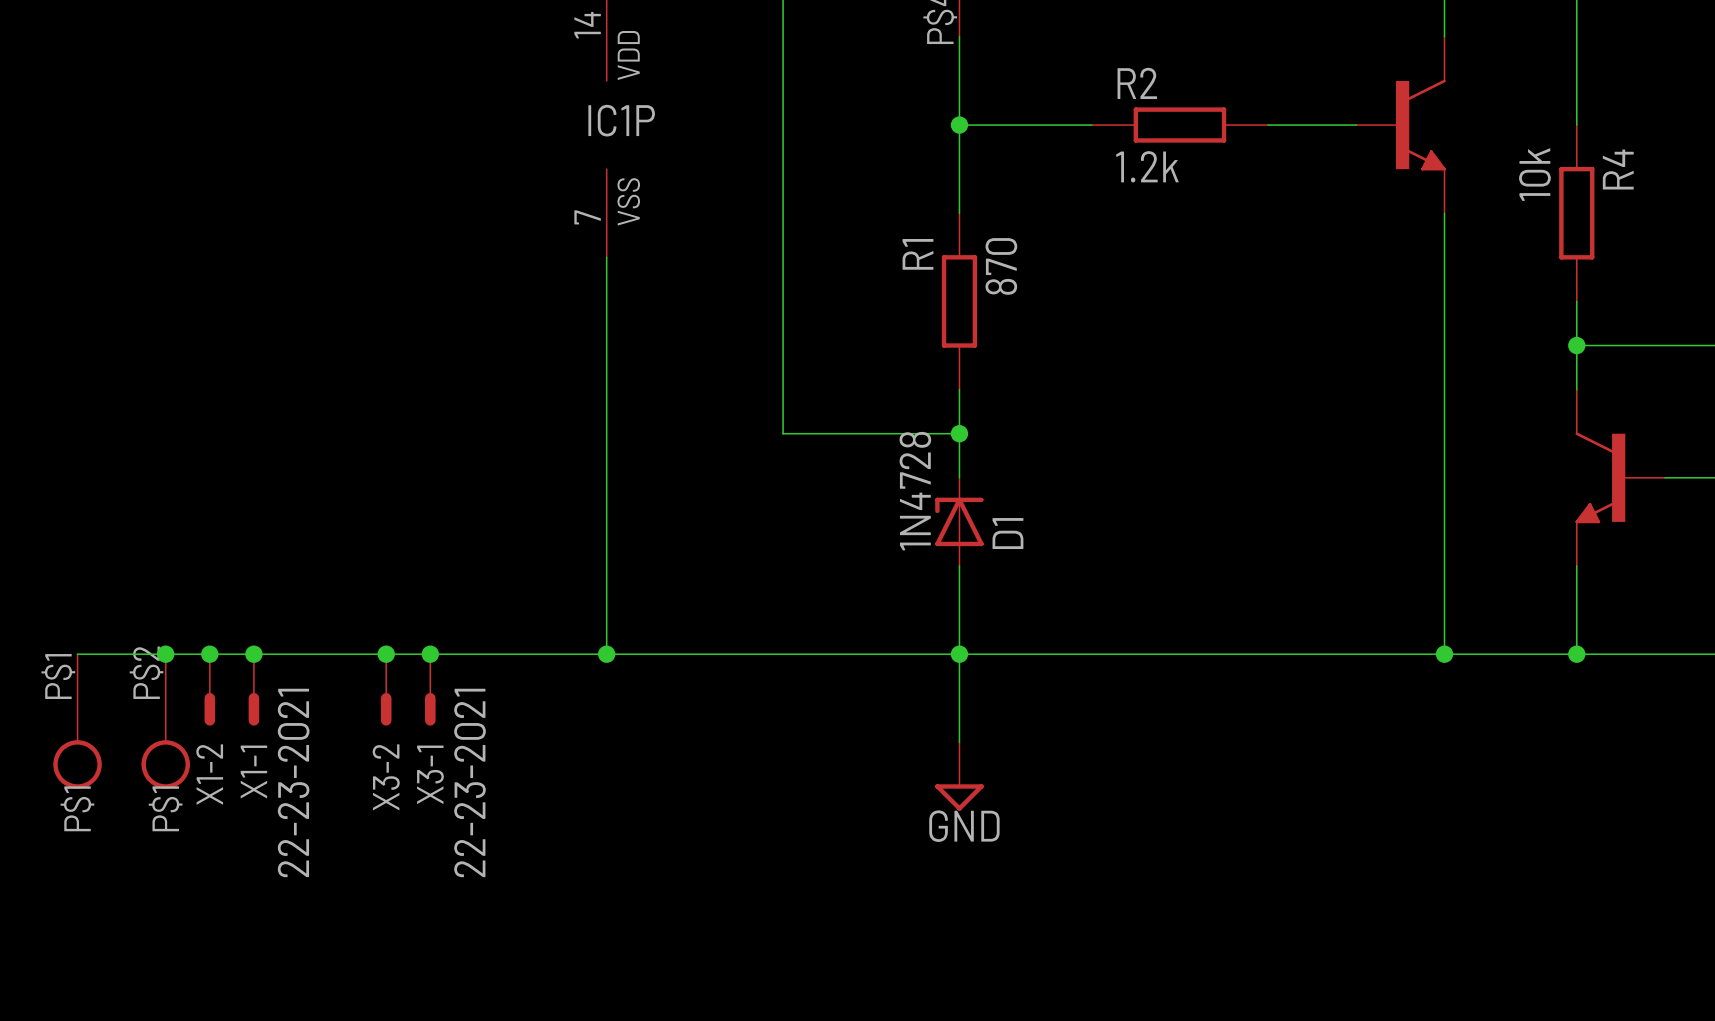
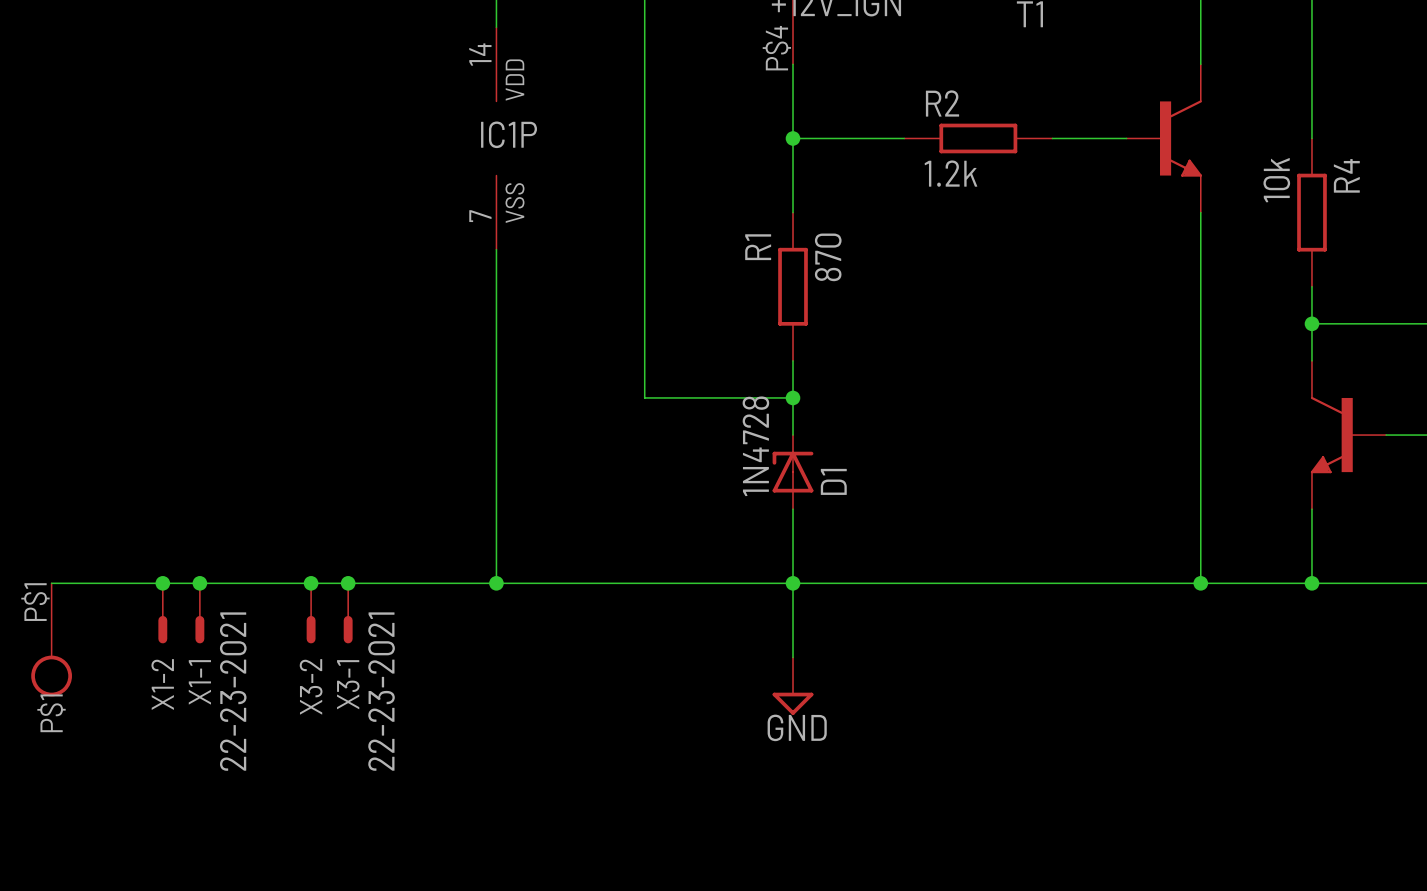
junction: (165, 654) -> none
part: (165, 721) -> none

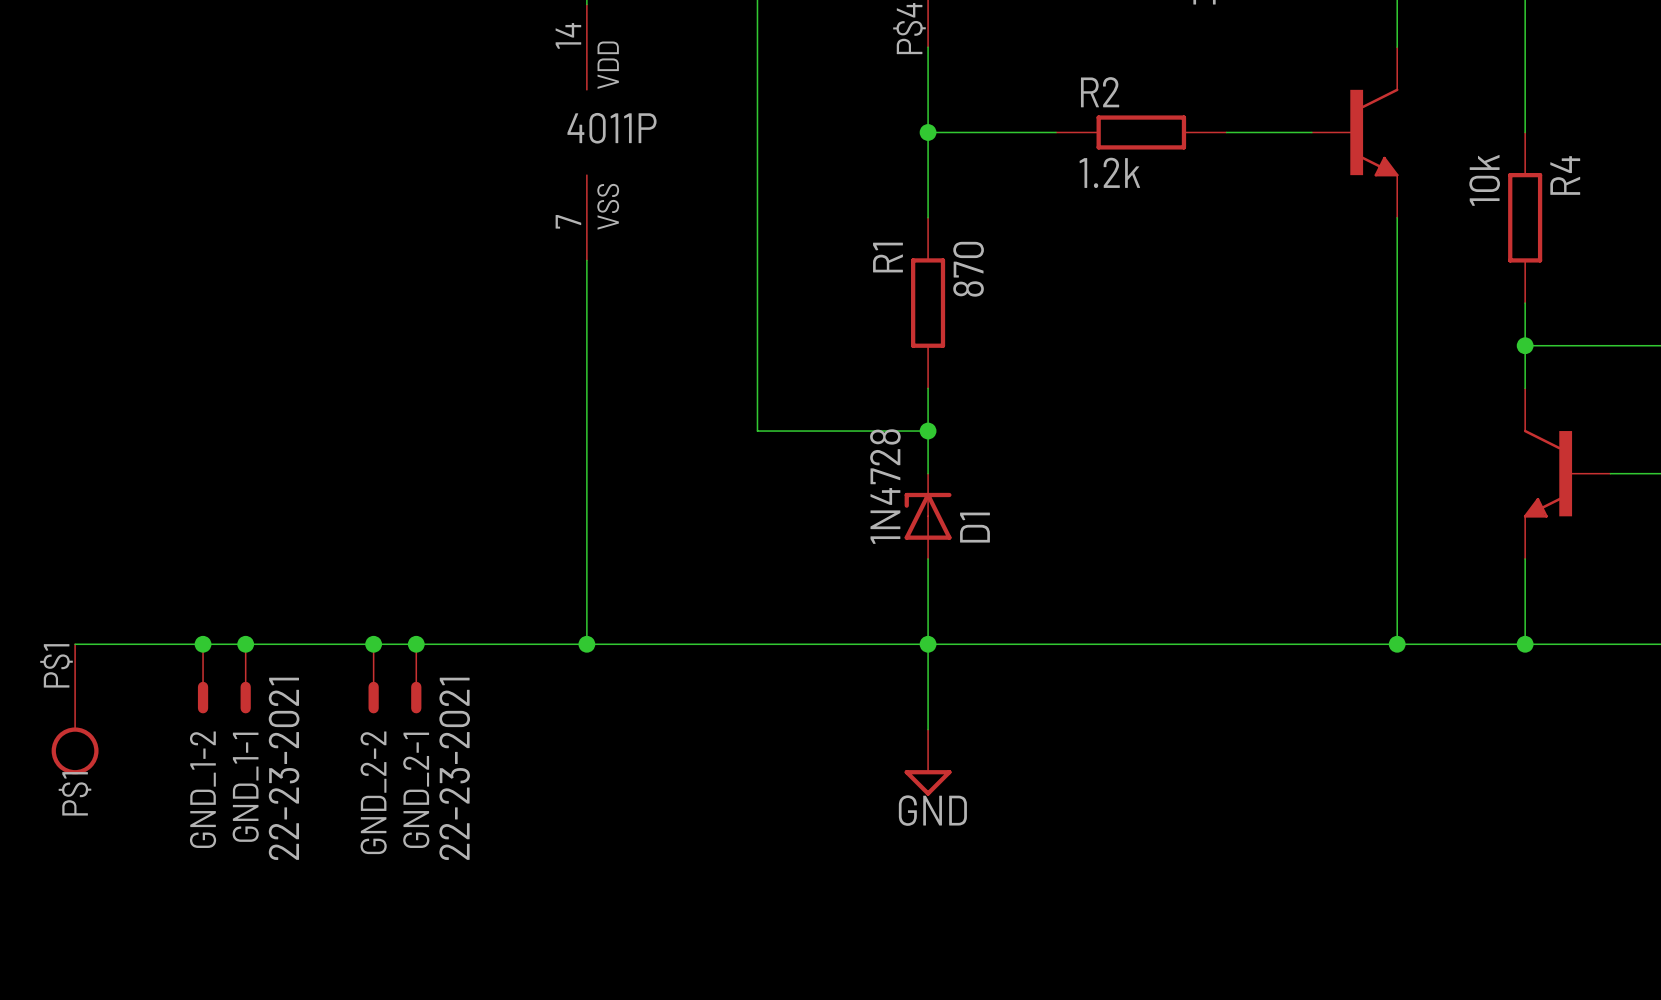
IC1P name: IC1P (509, 134) -> 4011P (612, 128)
X1-1 name: X1-1 (199, 682) -> GND_1-1 (245, 787)
X1-2 name: X1-2 (162, 684) -> GND_1-2 (203, 789)
X3-1 name: X3-1 (348, 684) -> GND_2-1 (416, 790)
X3-2 name: X3-2 (311, 686) -> GND_2-2 (373, 792)

